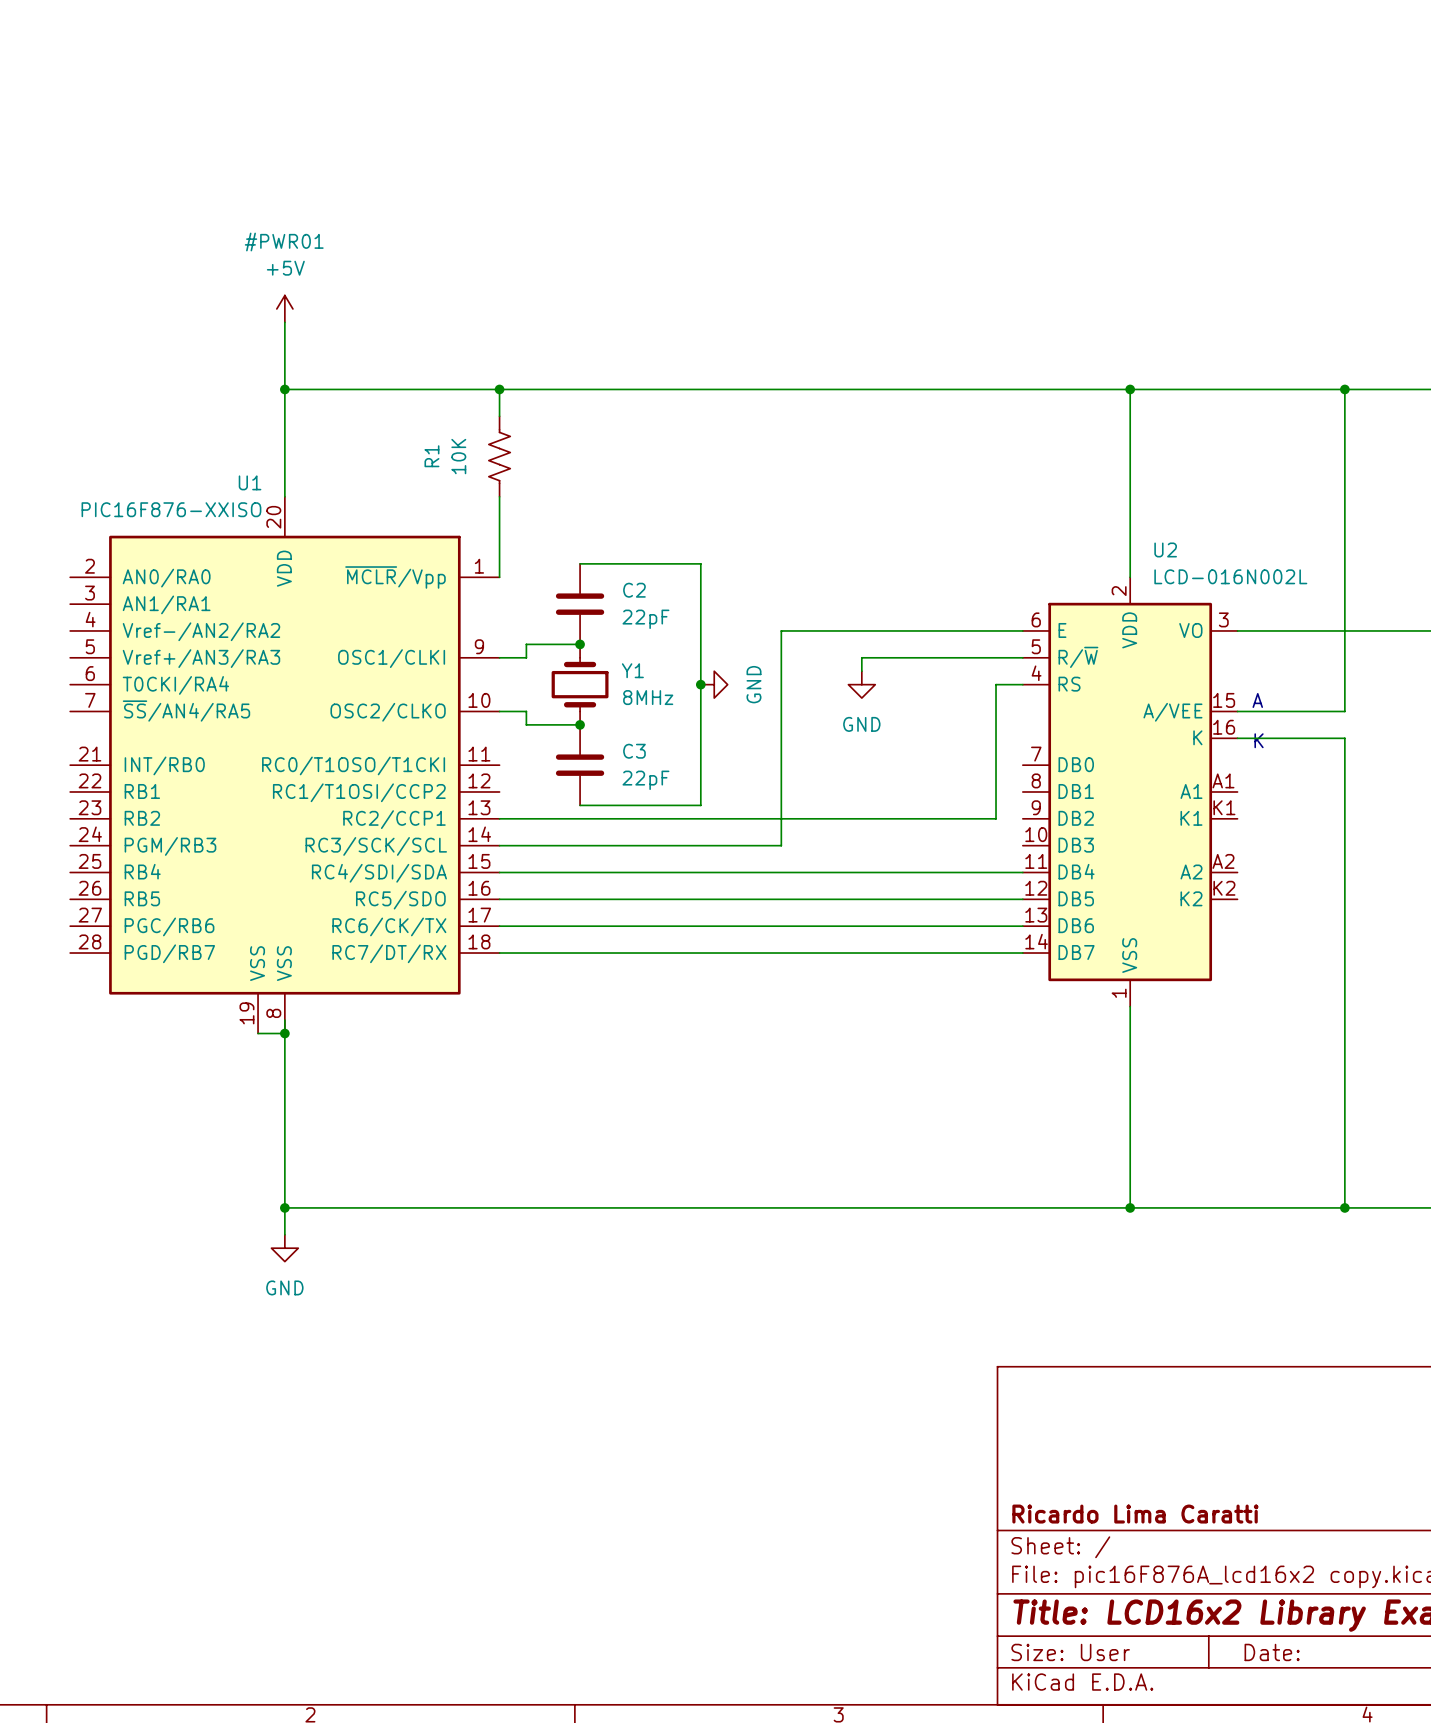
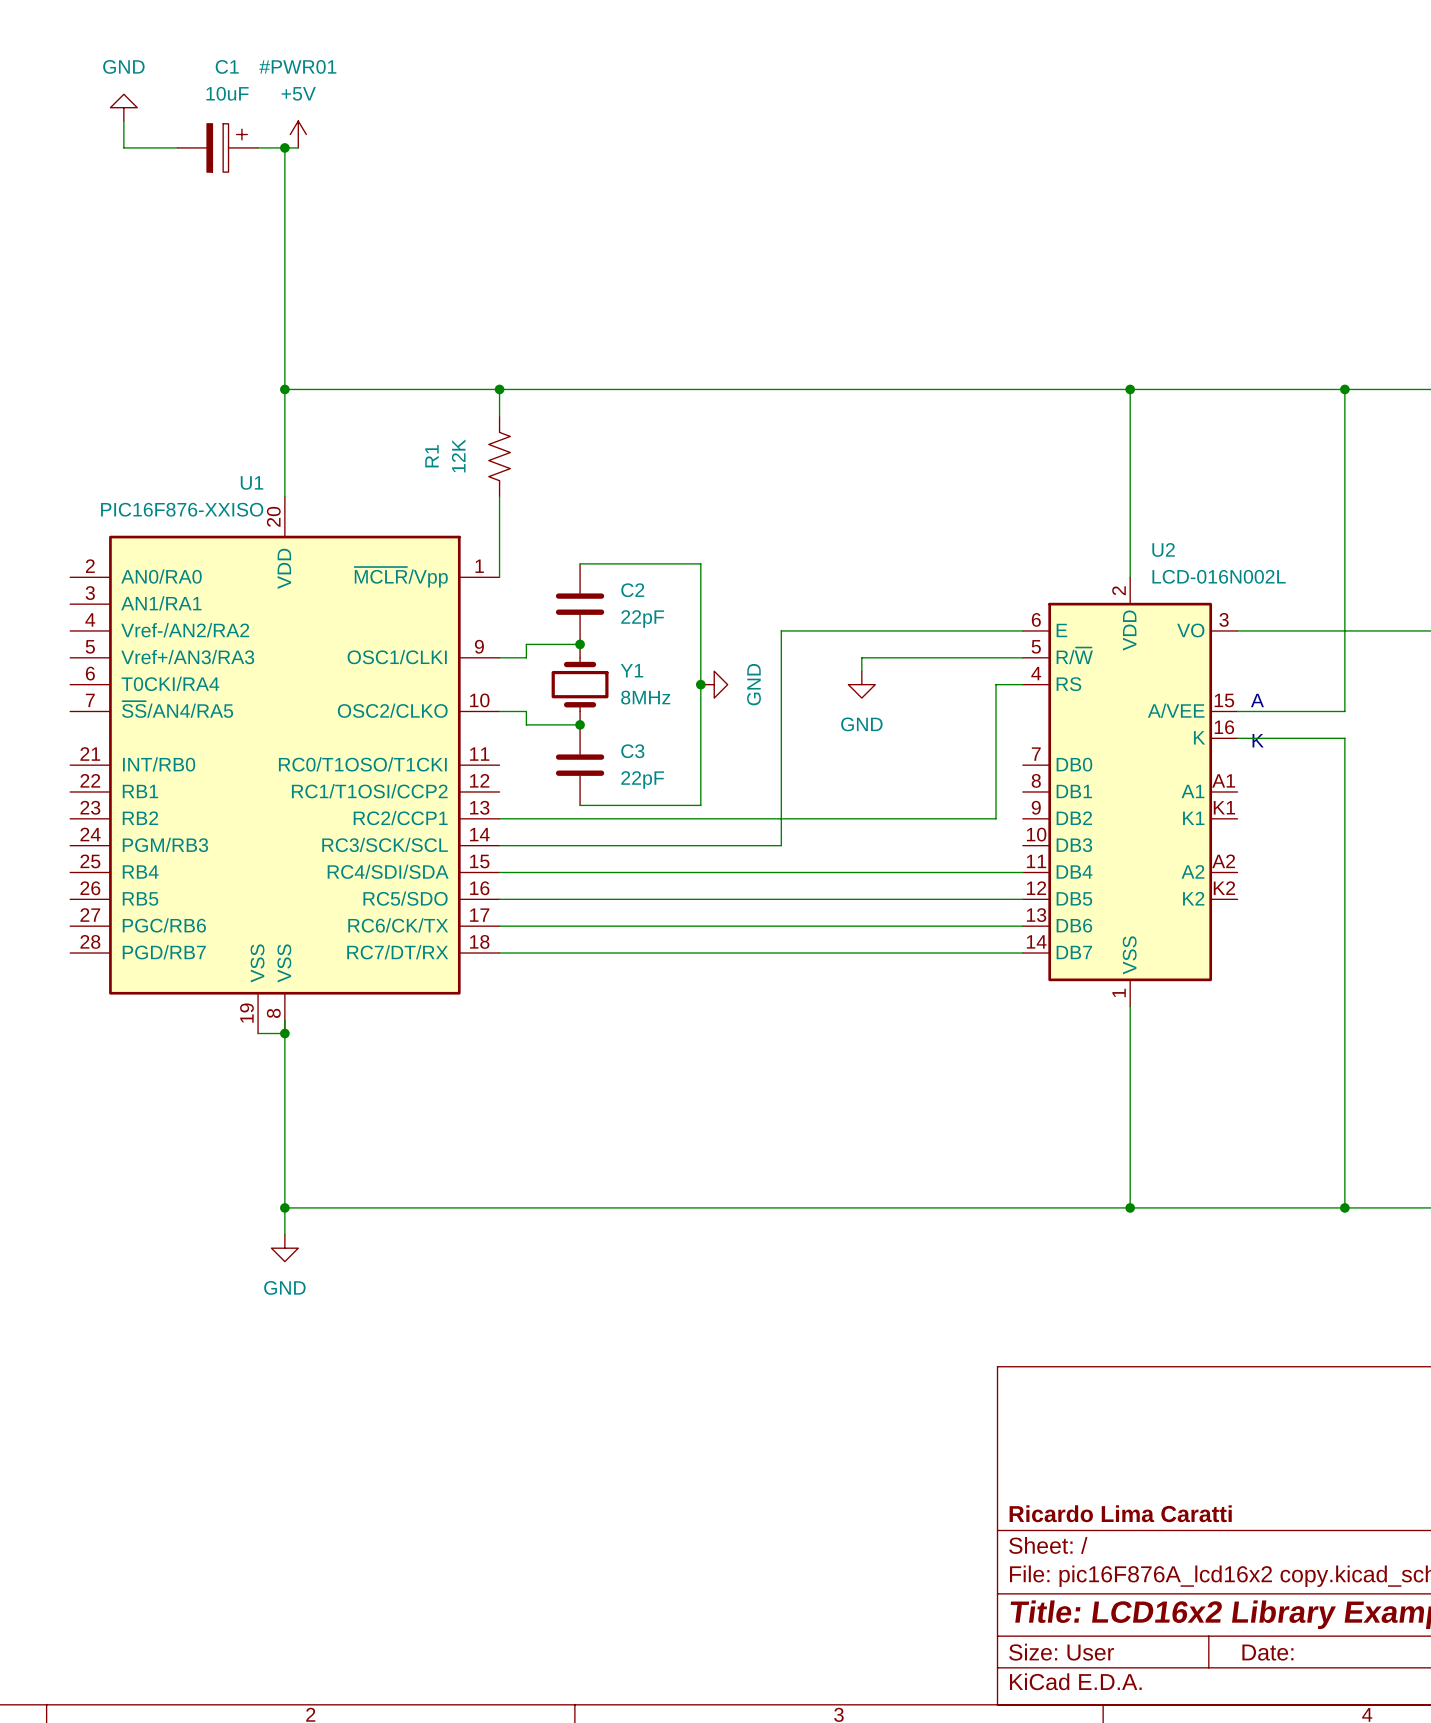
power symbol: none -> GND (123, 107)
wire: none -> (123, 121) (123, 147) (177, 147)
C1: none -> 10uF (217, 147)
wire: none -> (258, 147) (298, 147)
wire: none -> (284, 147) (284, 322)
junction: none -> (284, 147)
#PWR01 position: +5V (284, 308) -> +5V (298, 134)
R1 value: 10K (458, 456) -> 12K (458, 455)

